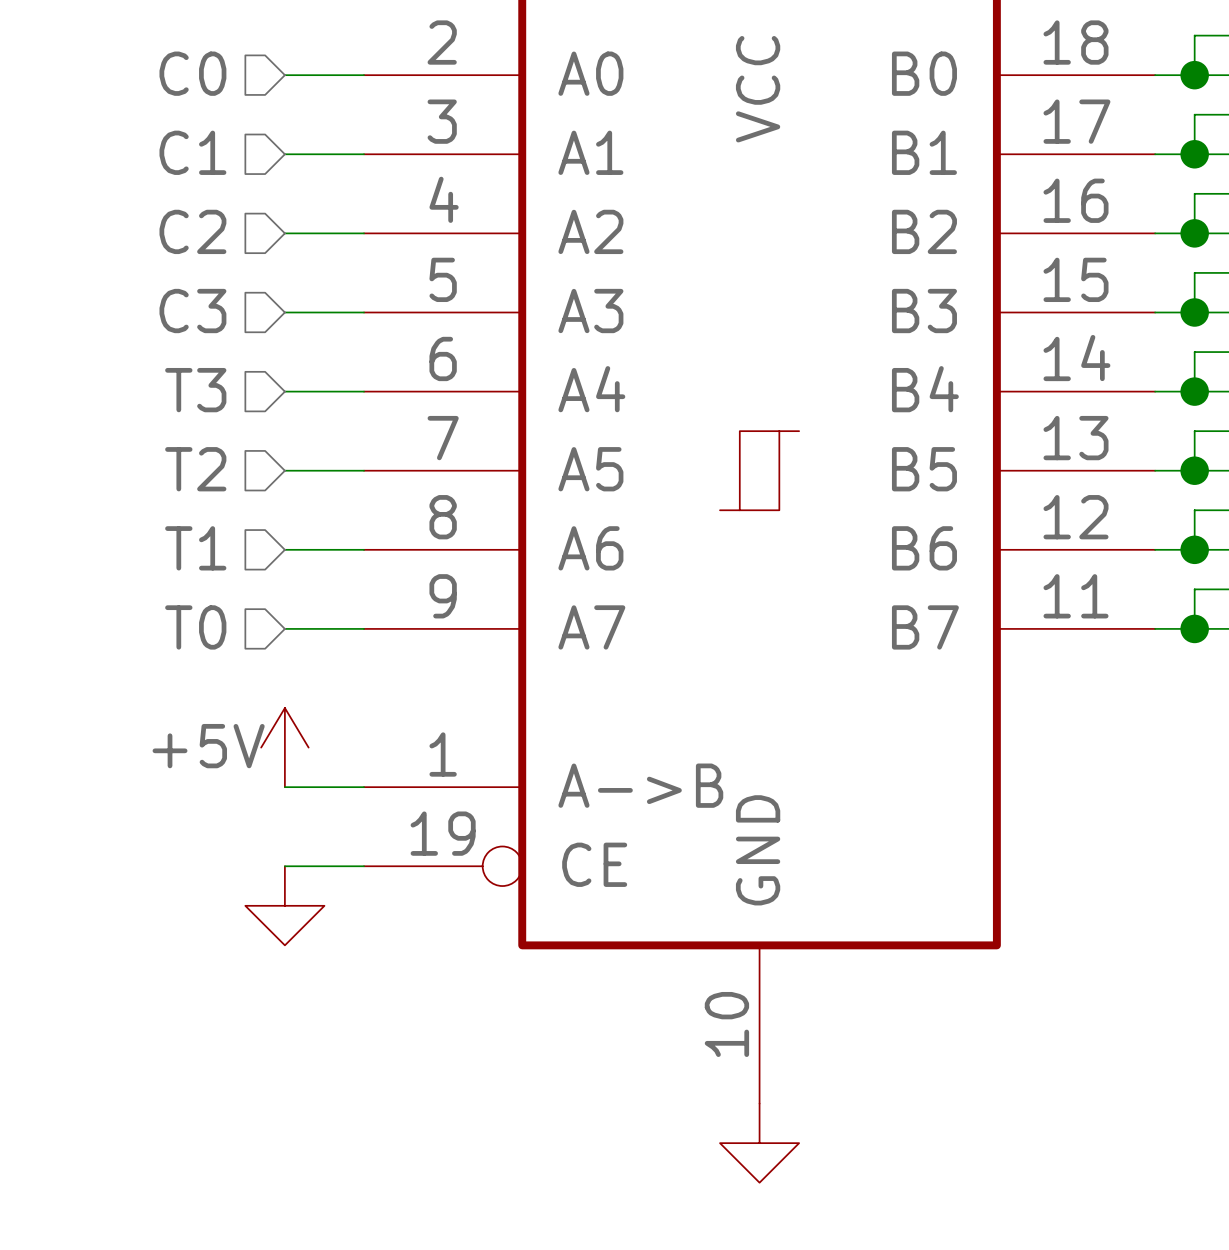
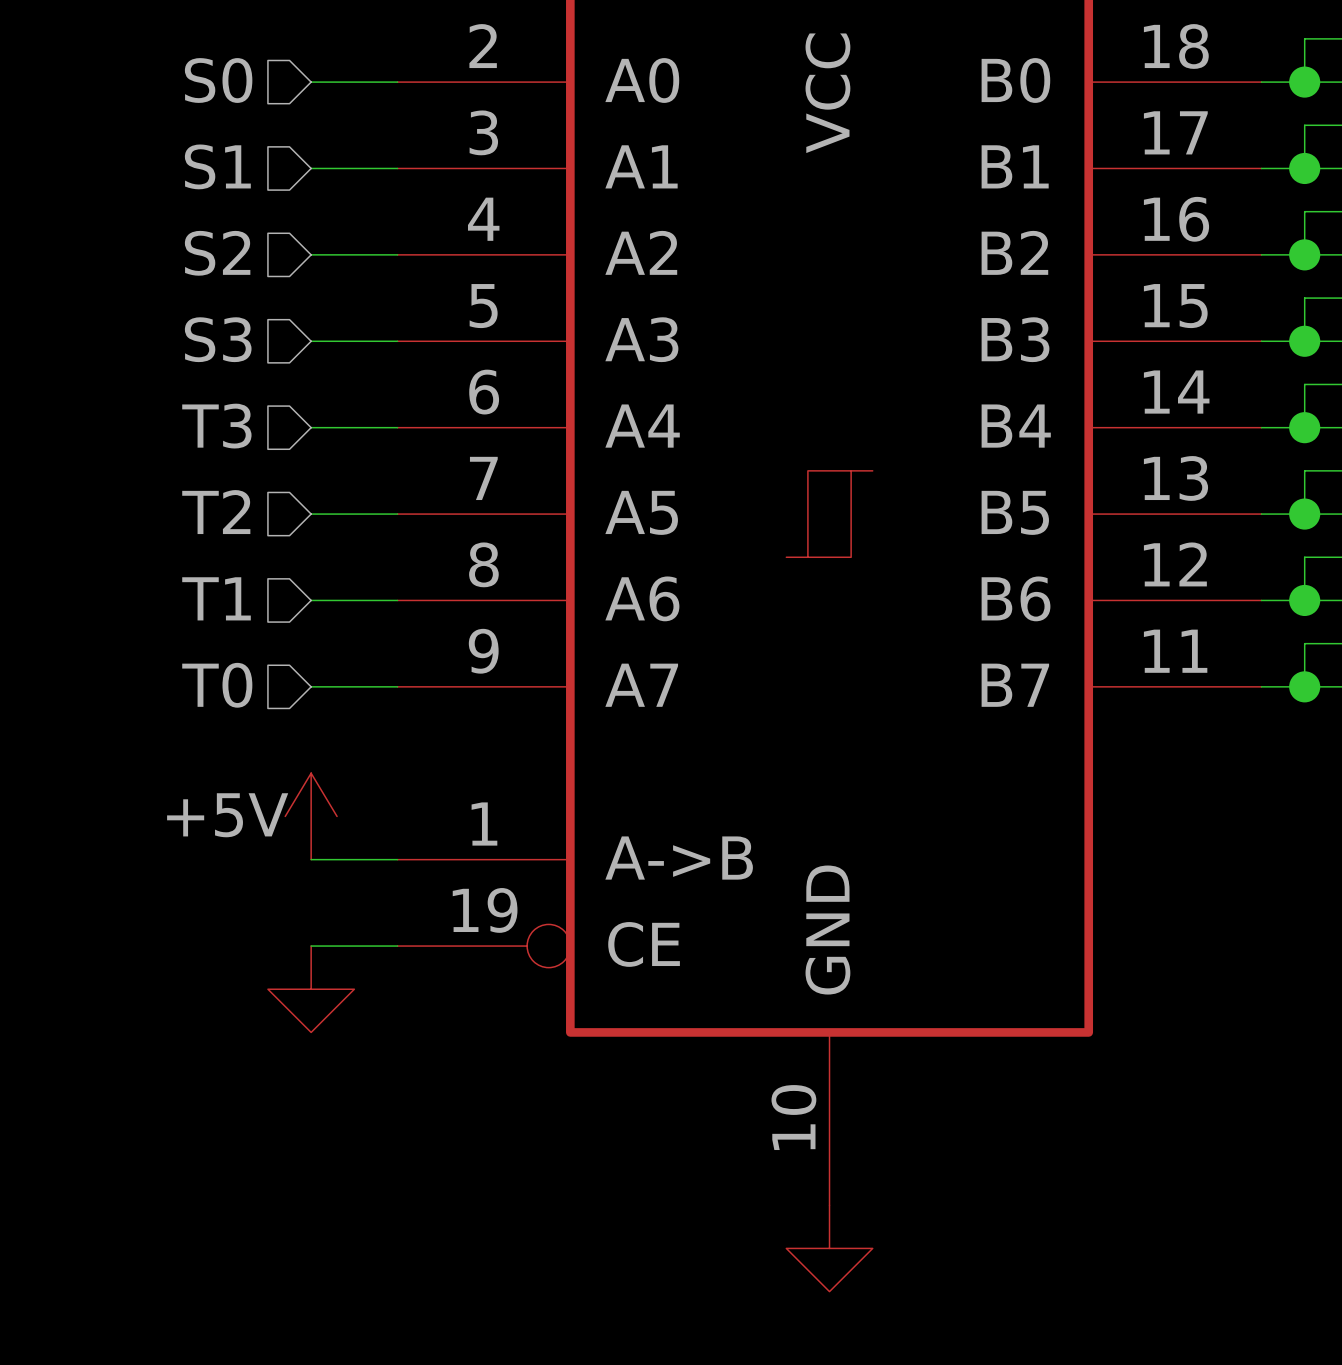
hierarchical label: C0 (192, 73) -> S0 (218, 80)
hierarchical label: C1 (192, 152) -> S1 (217, 166)
hierarchical label: C2 (192, 231) -> S2 (217, 253)
hierarchical label: C3 (192, 311) -> S3 (218, 339)

